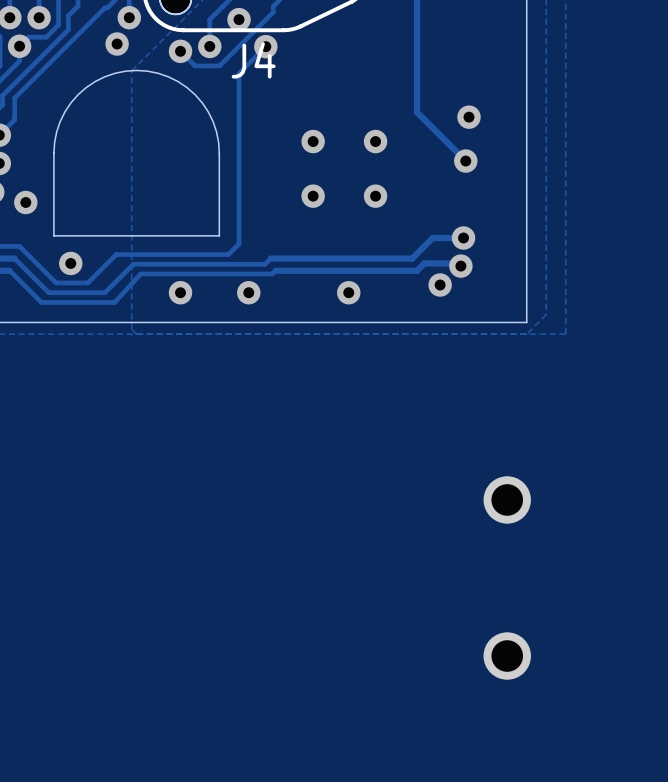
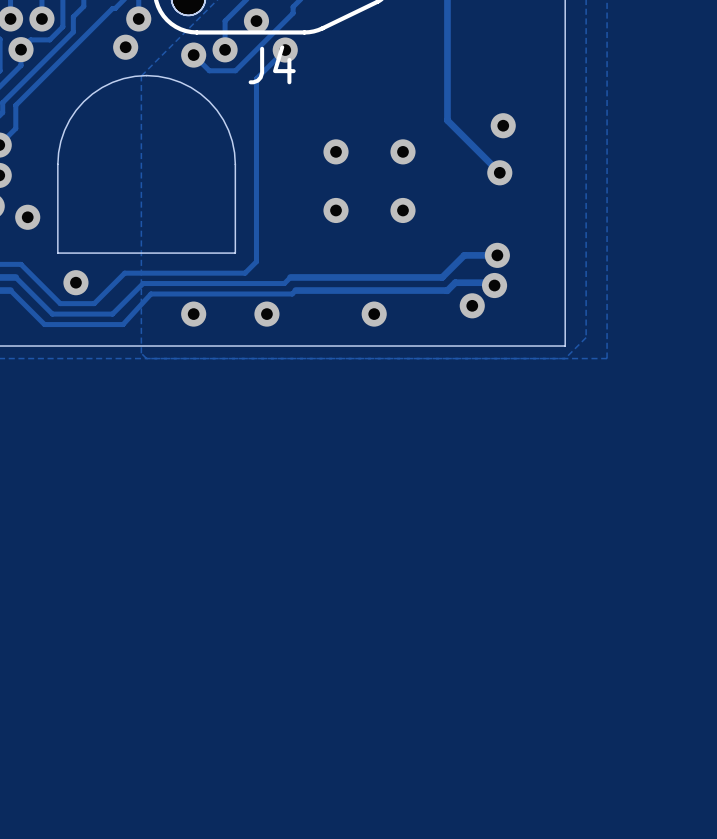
part: (507, 499) -> none
part: (507, 656) -> none

